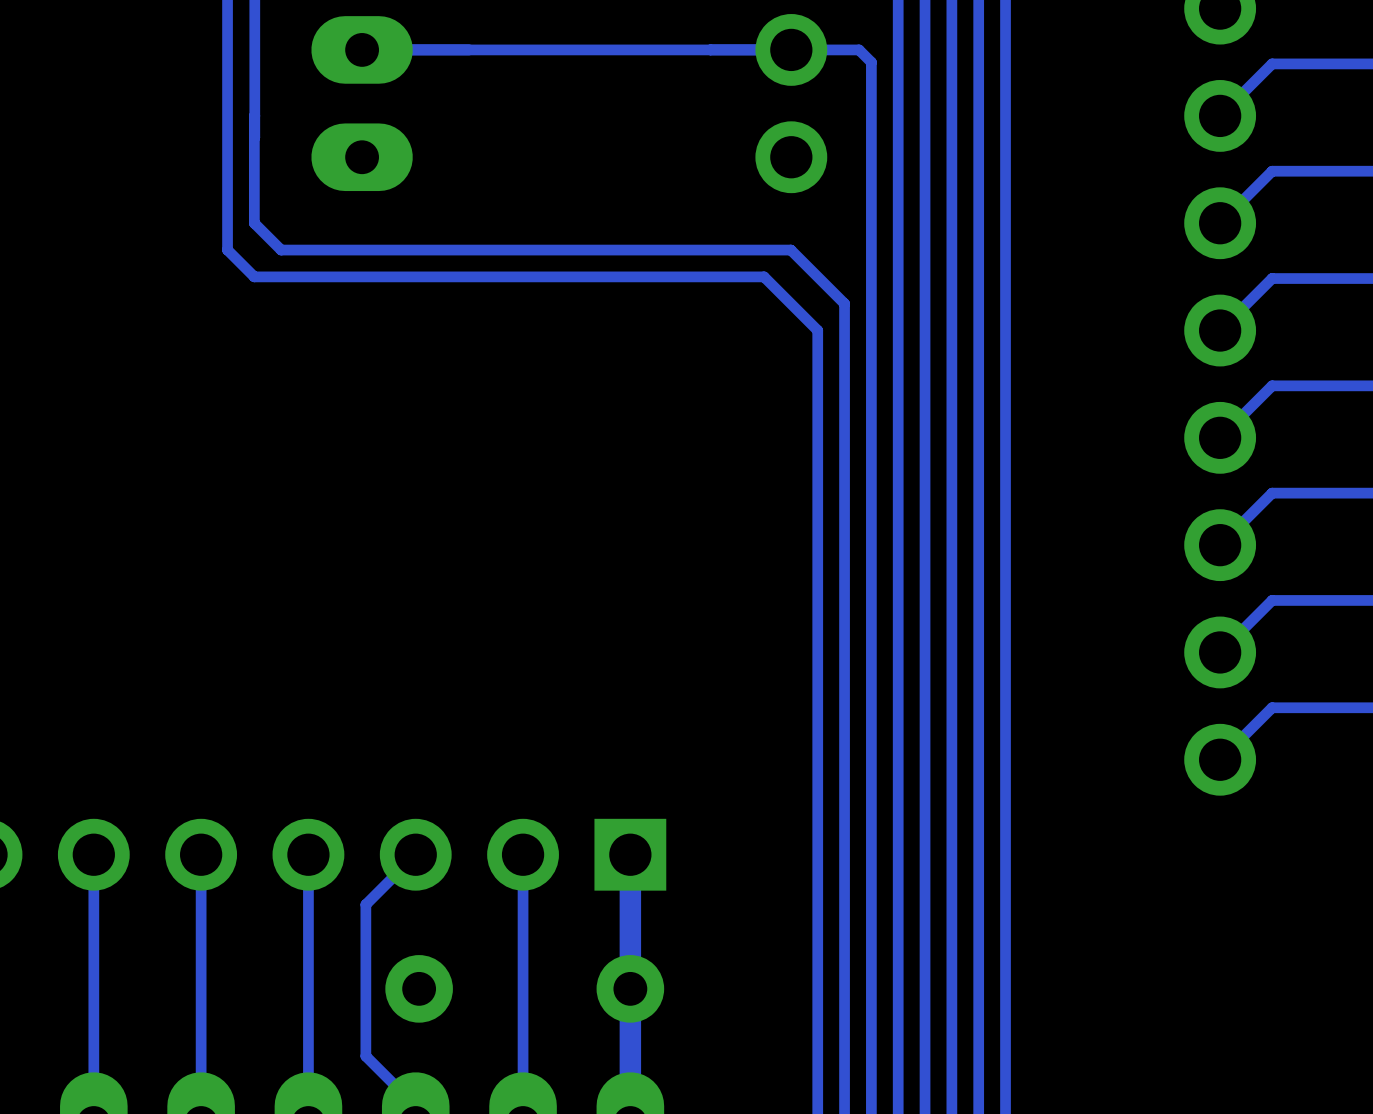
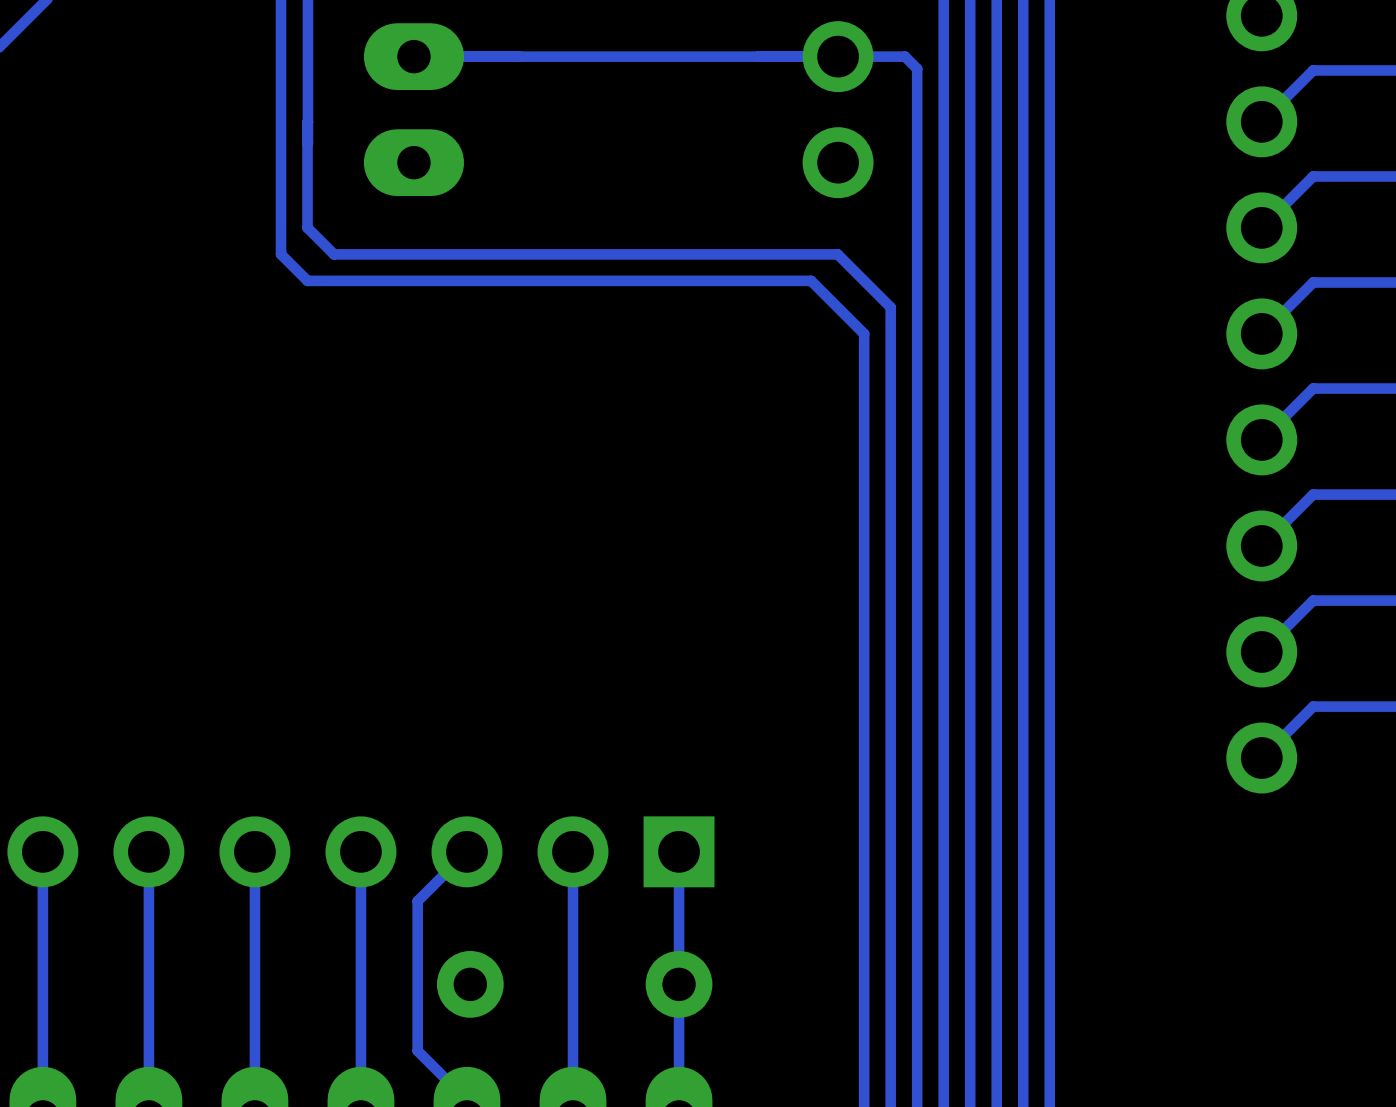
bottom track width: thick (630, 854) (630, 1084) -> thin (679, 851) (679, 1079)

